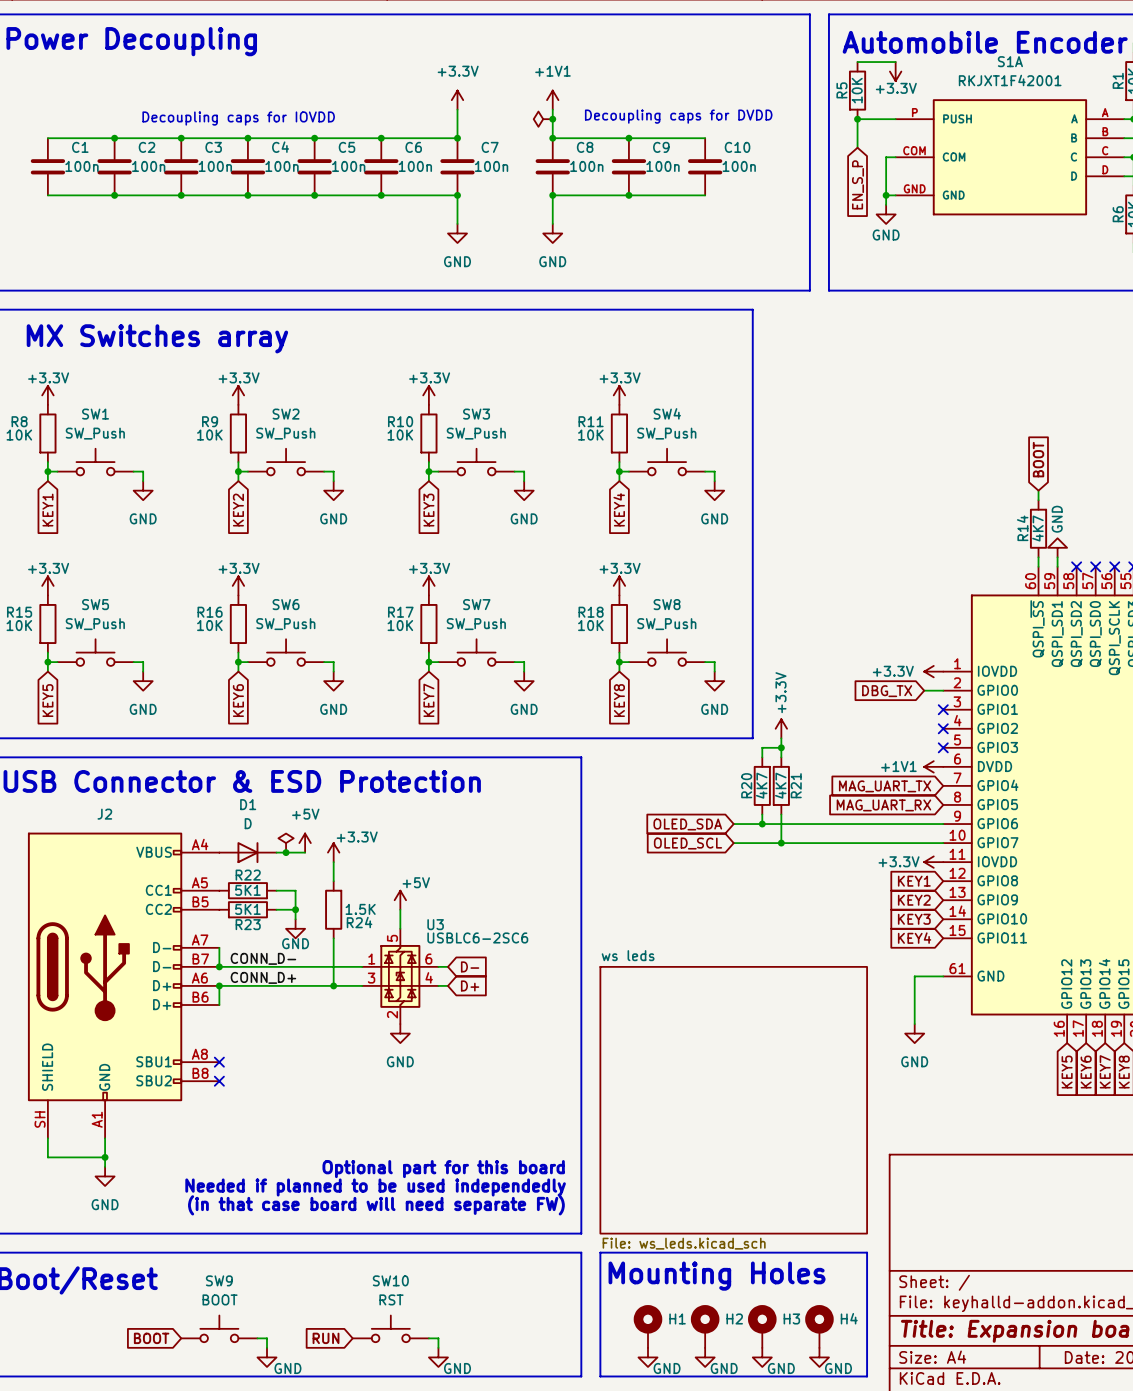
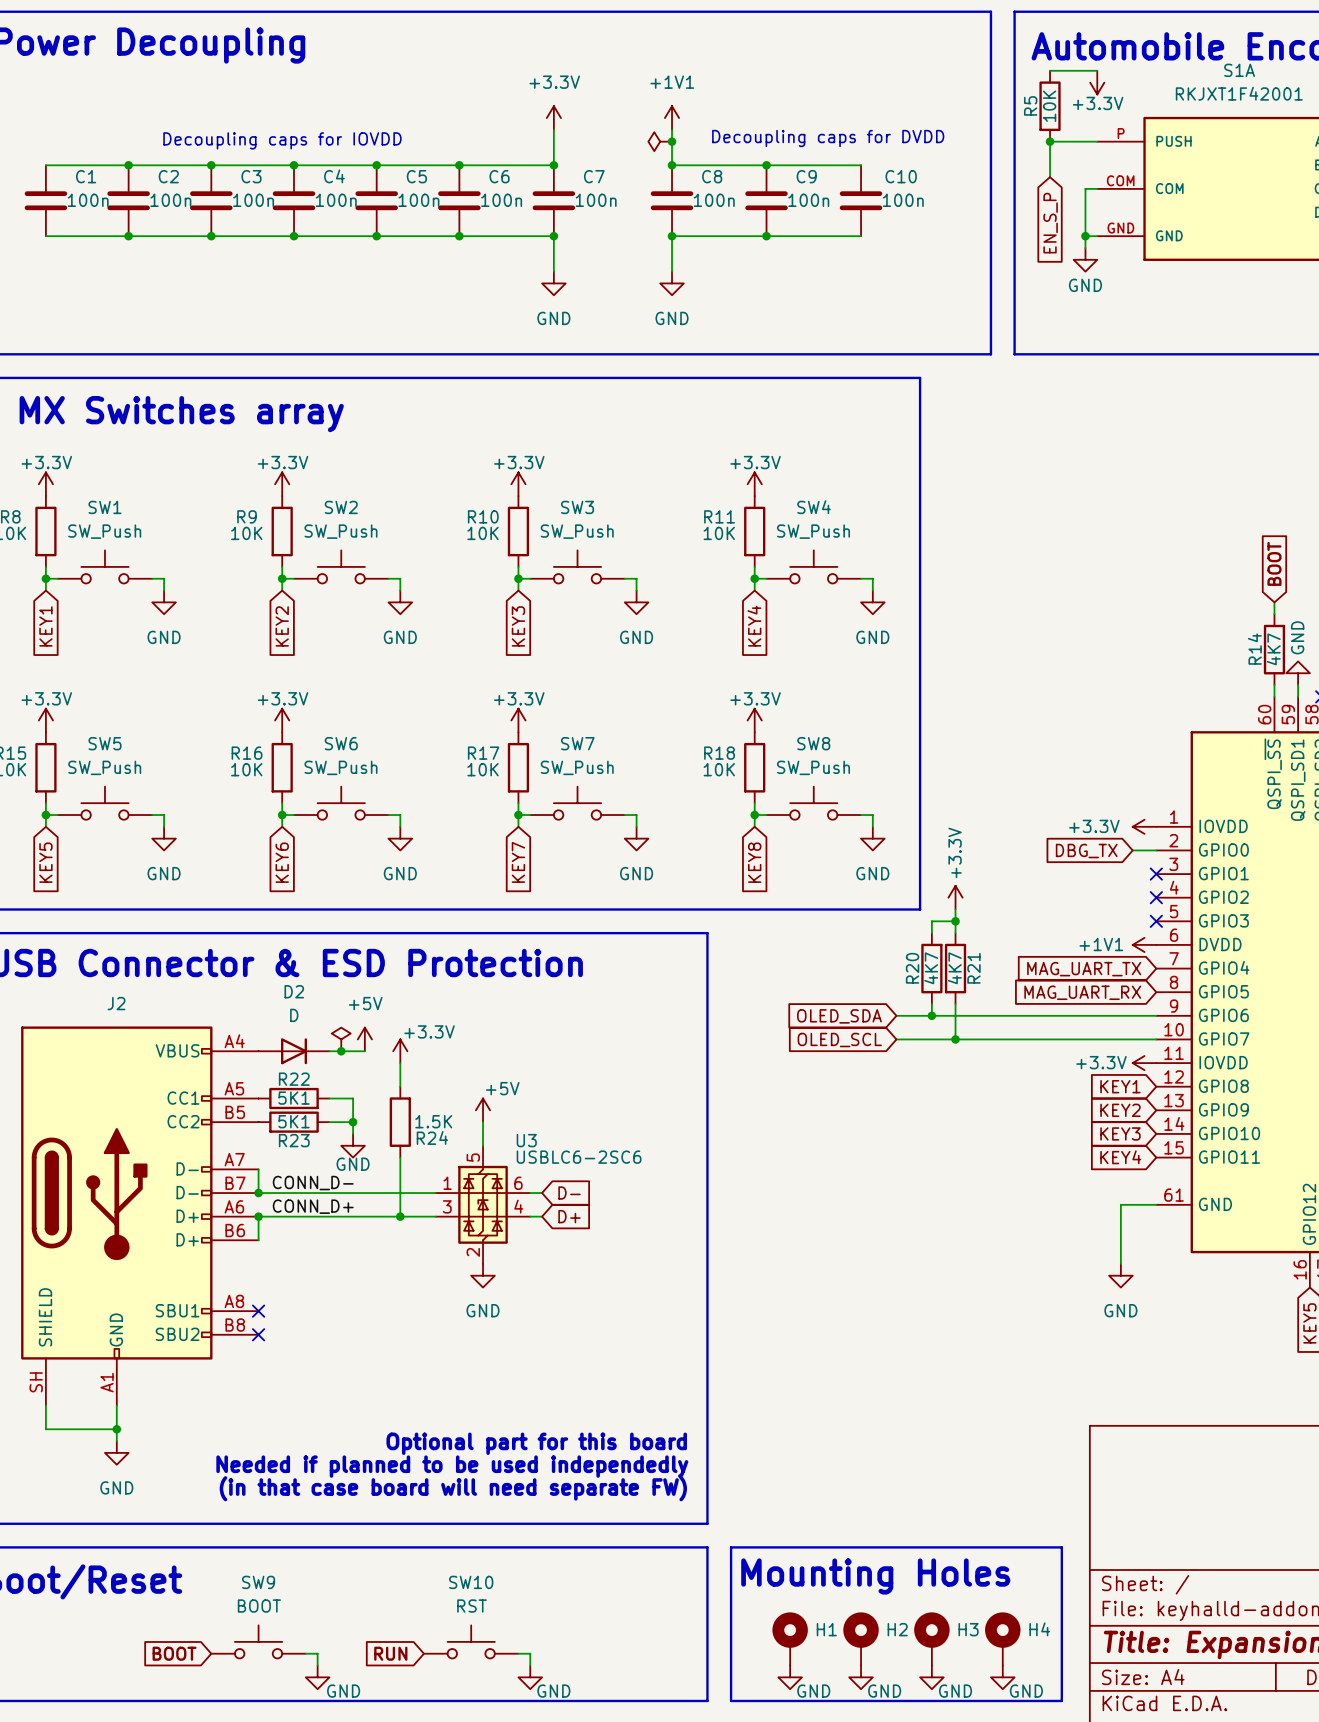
D1 name: D1 (248, 804) -> D2 (294, 991)
sheet ws leds: File: ws_leds.kicad_sch (733, 1100) -> none

